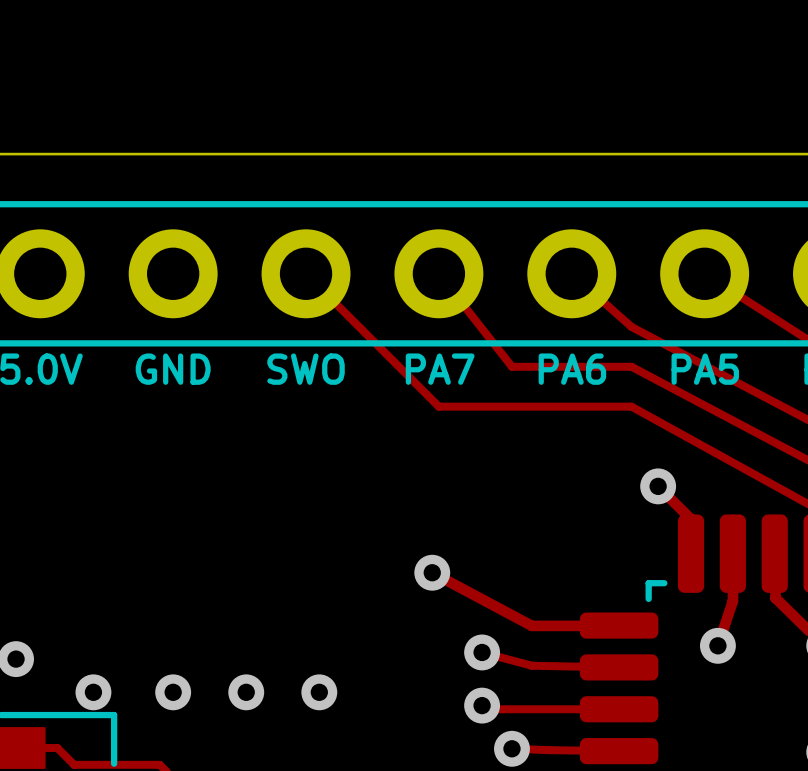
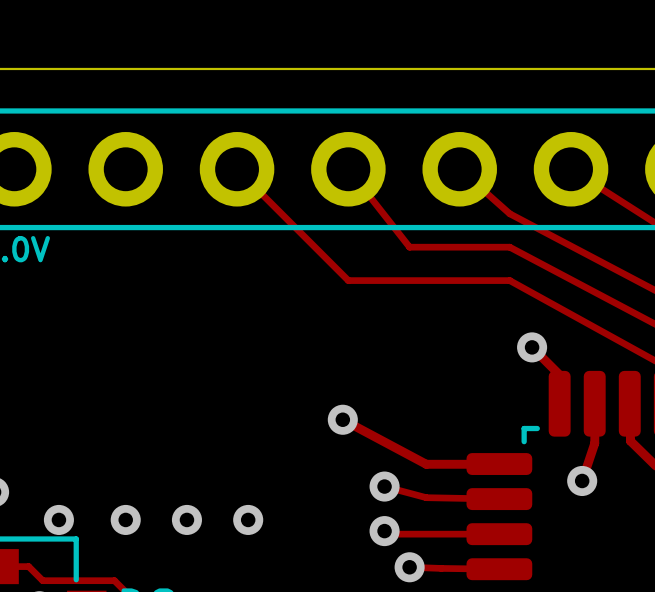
text: GND (173, 369) -> none
text: SWO (306, 369) -> none
text: PA7 (440, 369) -> none
text: PA6 (572, 369) -> none
text: PA5 (705, 369) -> none

